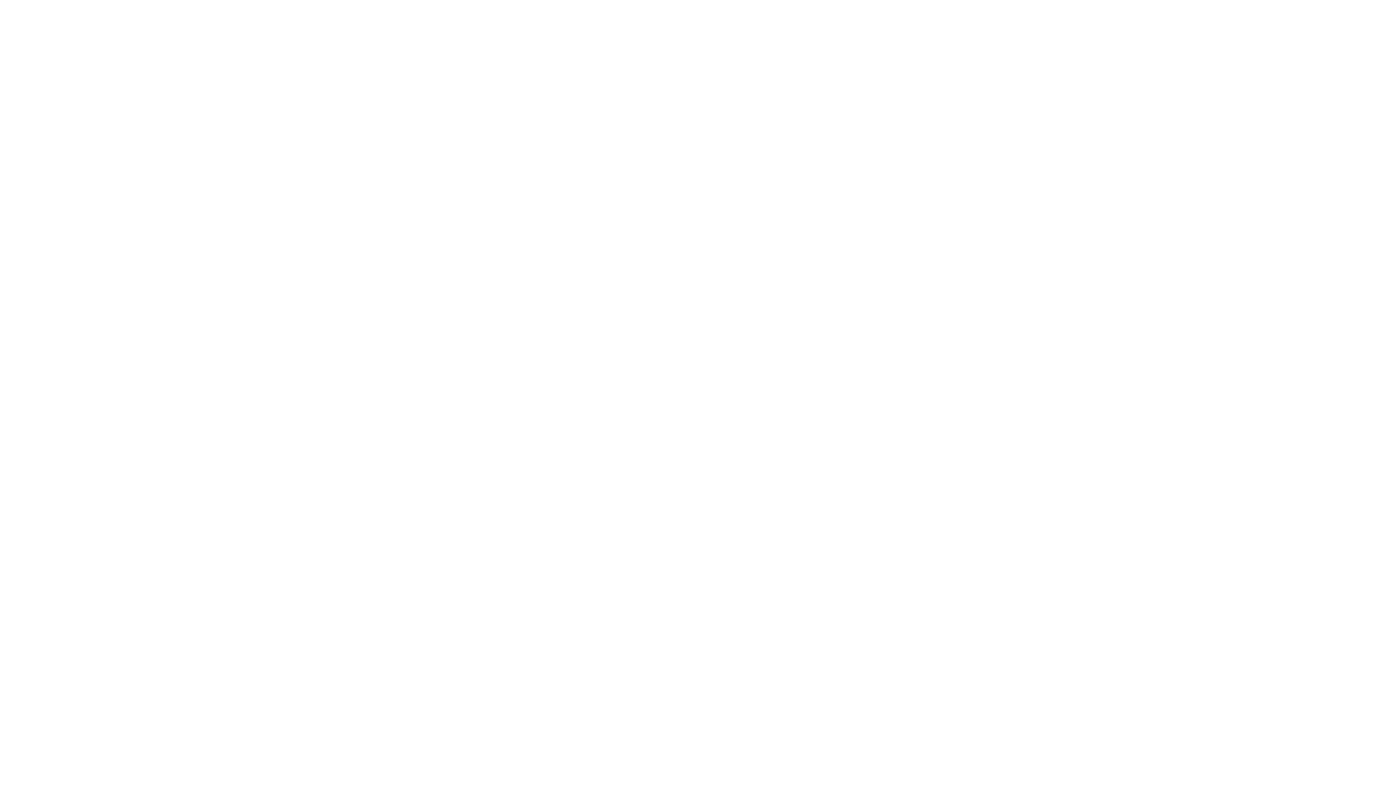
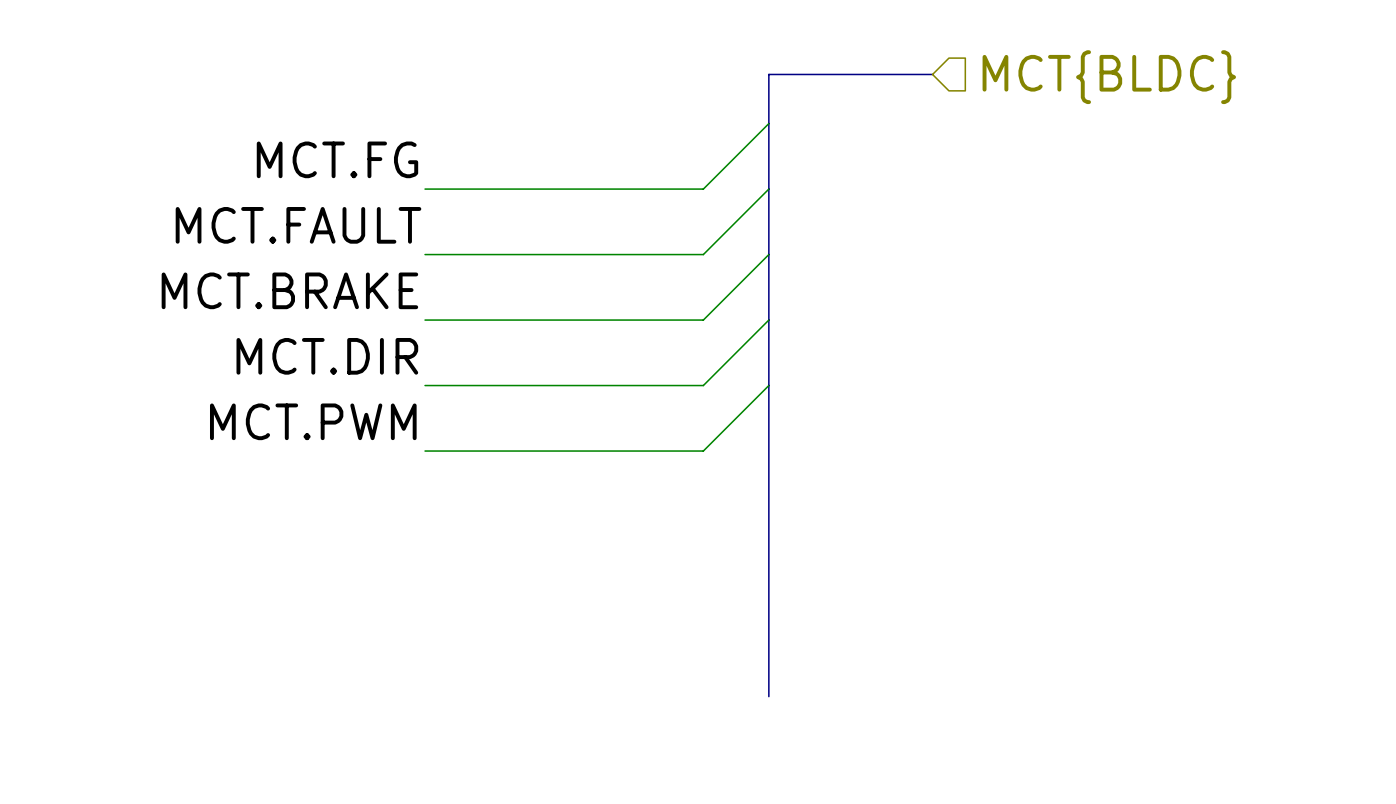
bus: none -> (932, 74) (768, 74) (768, 696)
hierarchical label: none -> MCT{BLDC} (1109, 77)
wire: none -> (768, 123) (703, 189) (425, 189)
label: none -> MCT.FG (337, 159)
wire: none -> (768, 189) (703, 254) (425, 254)
label: none -> MCT.FAULT (298, 225)
wire: none -> (768, 254) (703, 320) (425, 320)
label: none -> MCT.BRAKE (289, 290)
wire: none -> (768, 320) (703, 385) (425, 385)
label: none -> MCT.DIR (327, 356)
wire: none -> (768, 385) (703, 451) (425, 451)
label: none -> MCT.PWM (313, 421)

